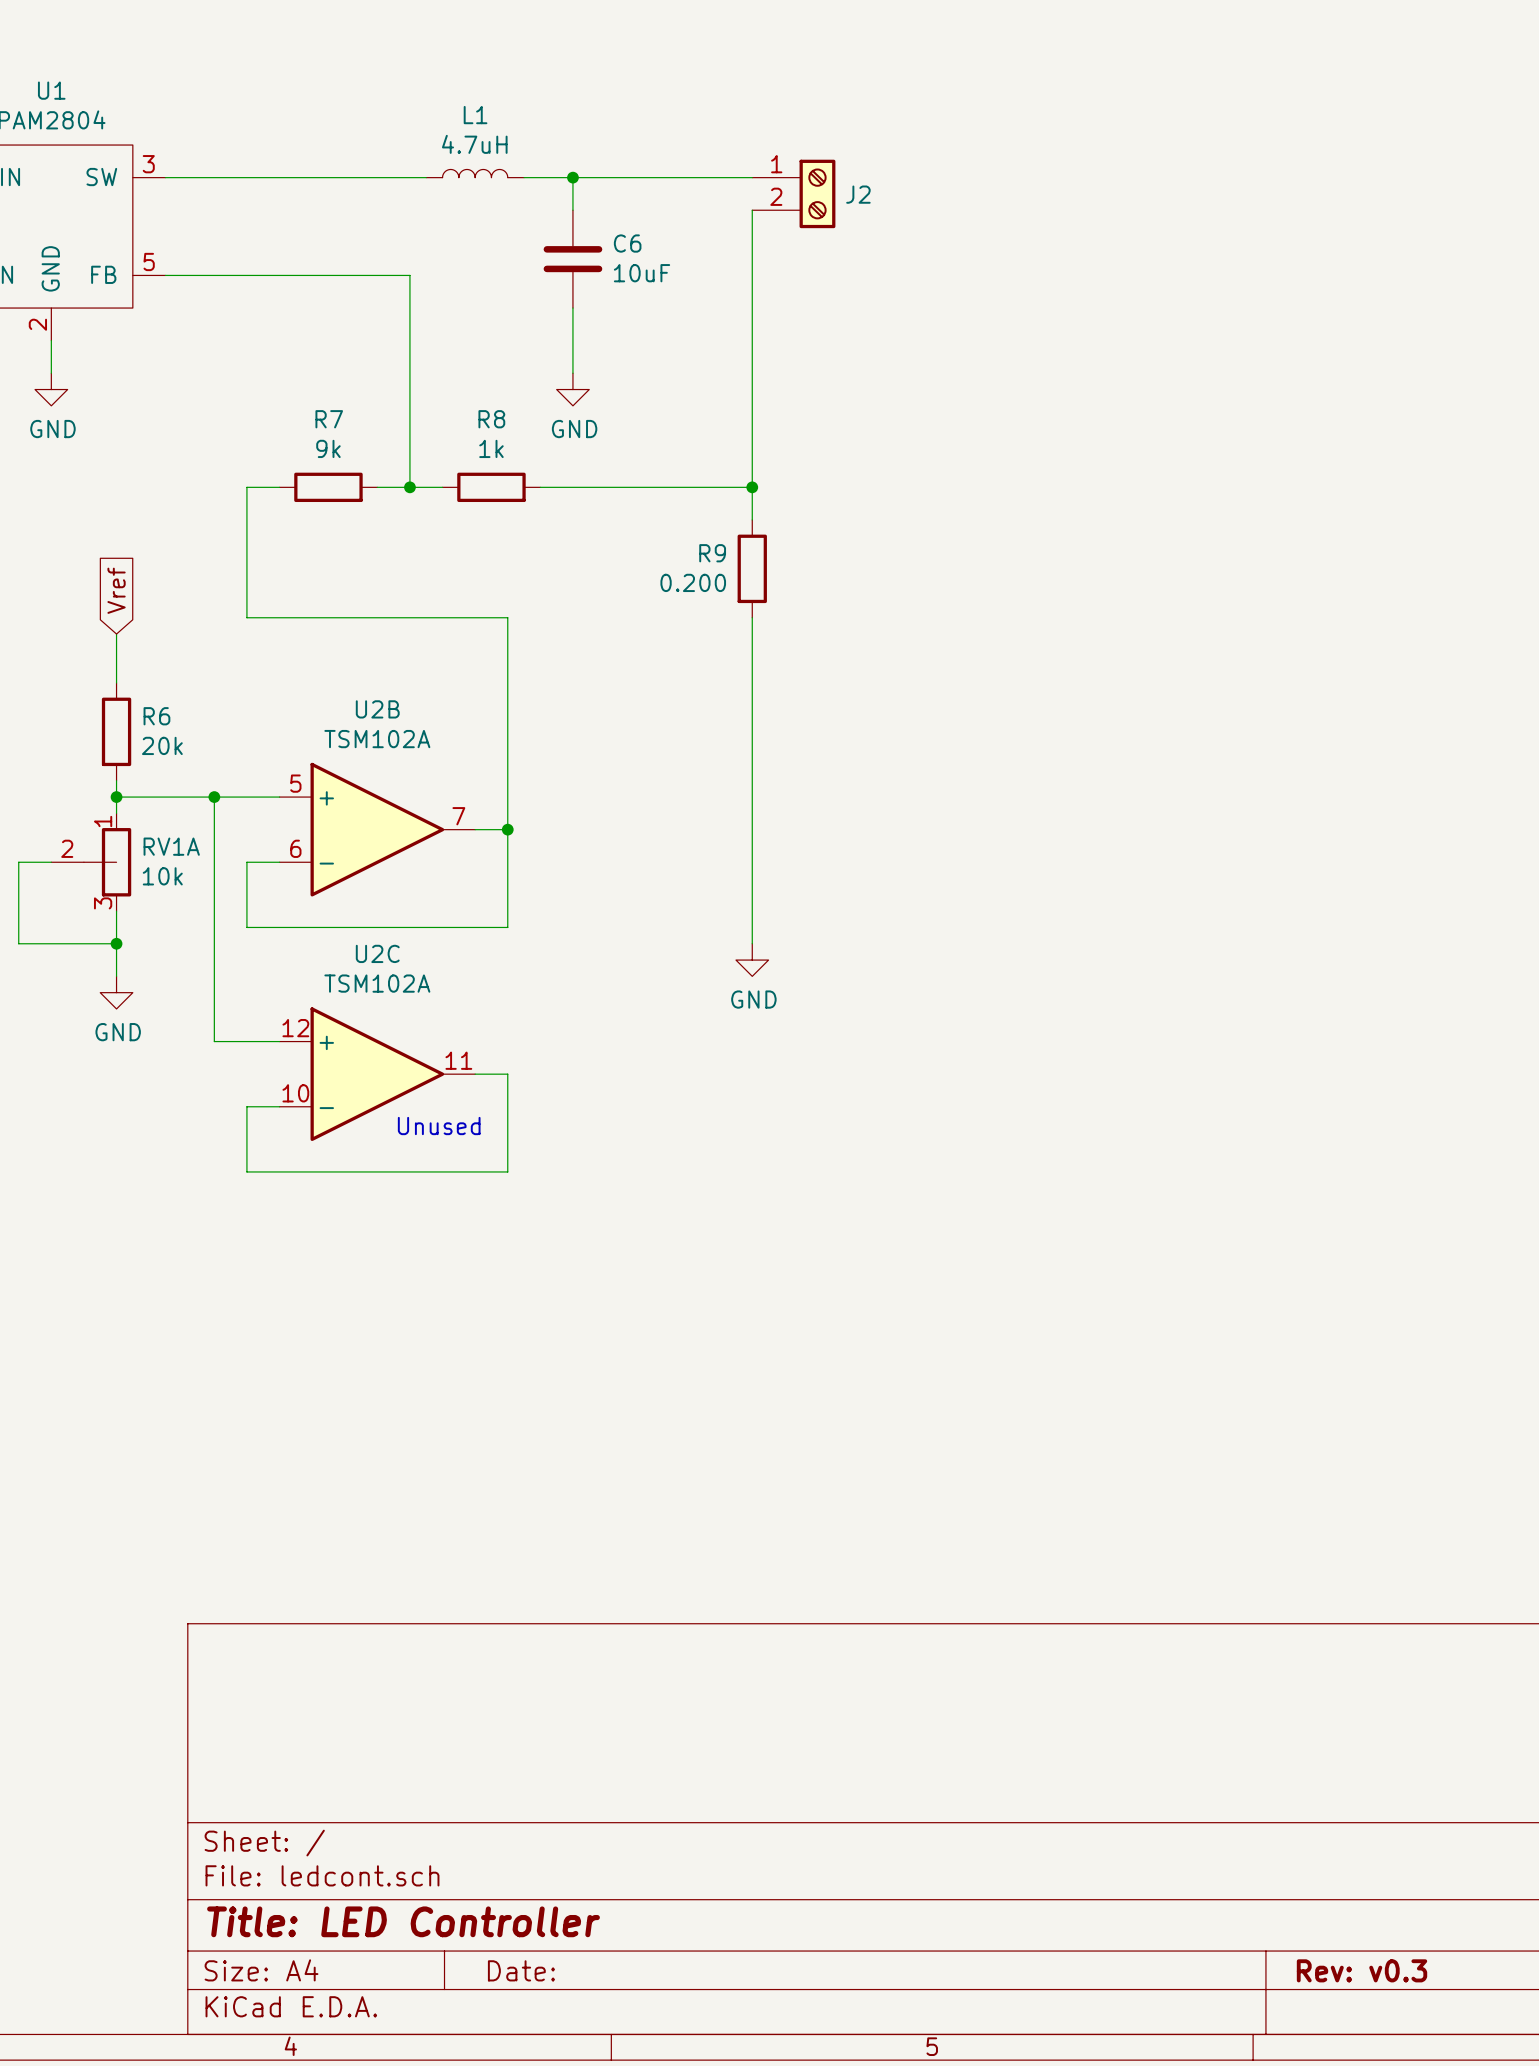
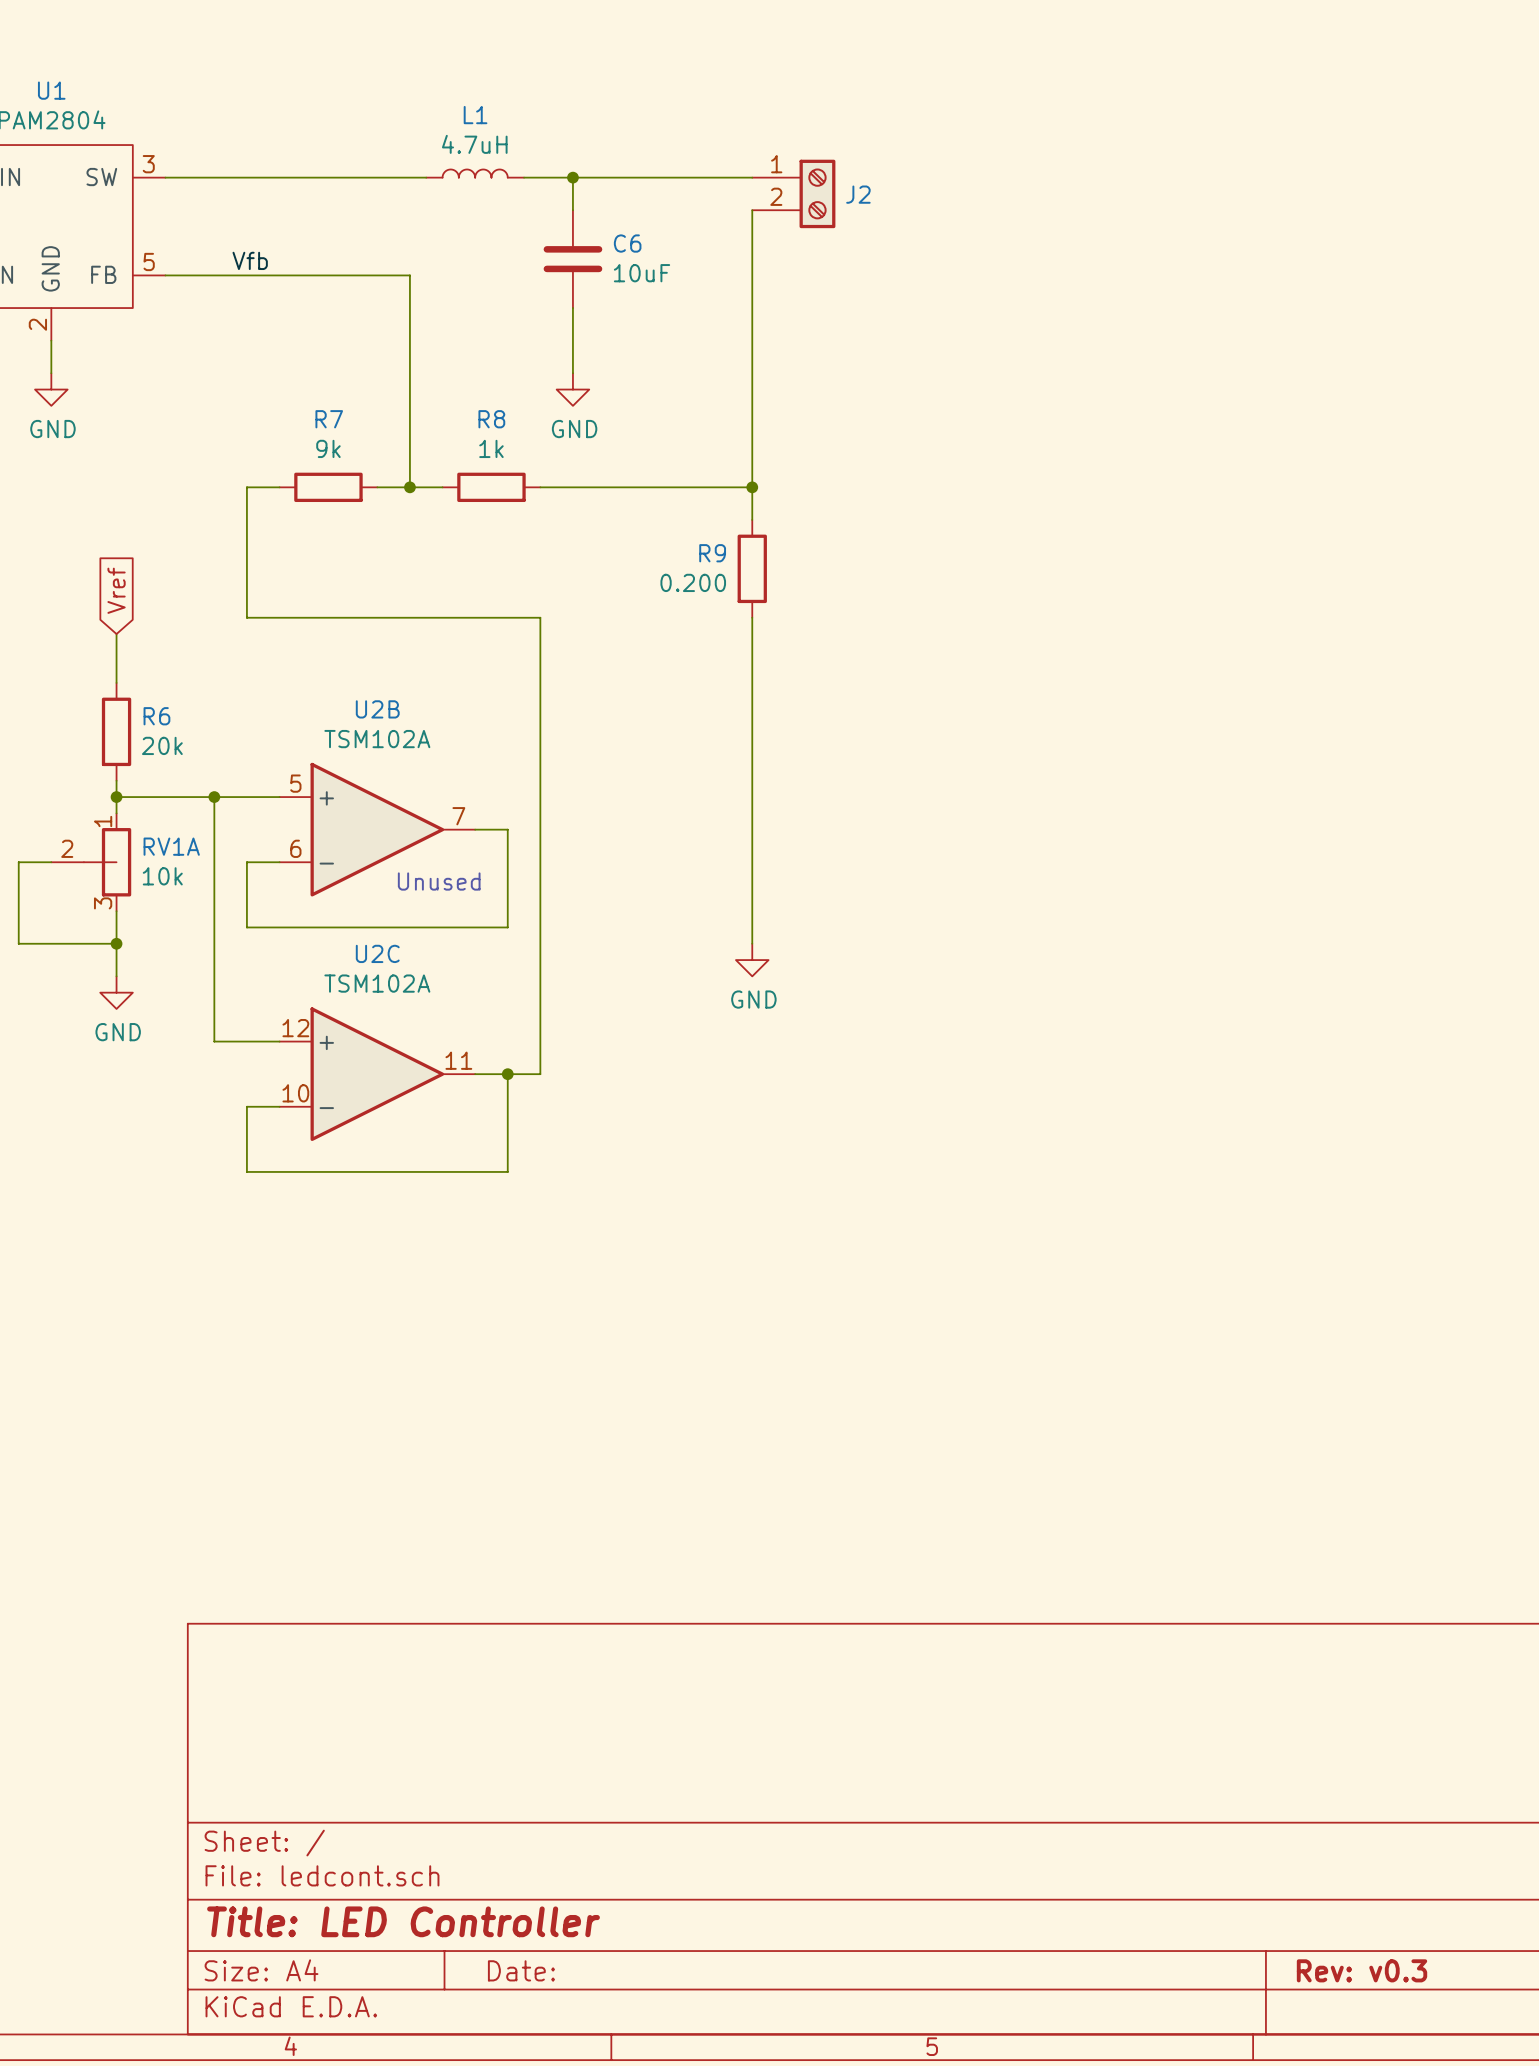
label: none -> Vfb (250, 260)
wire: (507, 617) (507, 829) -> (507, 617) (540, 617) (540, 1074) (507, 1074)
junction: (507, 829) -> none
junction: none -> (507, 1074)
text position: Unused (439, 1126) -> Unused (439, 881)

